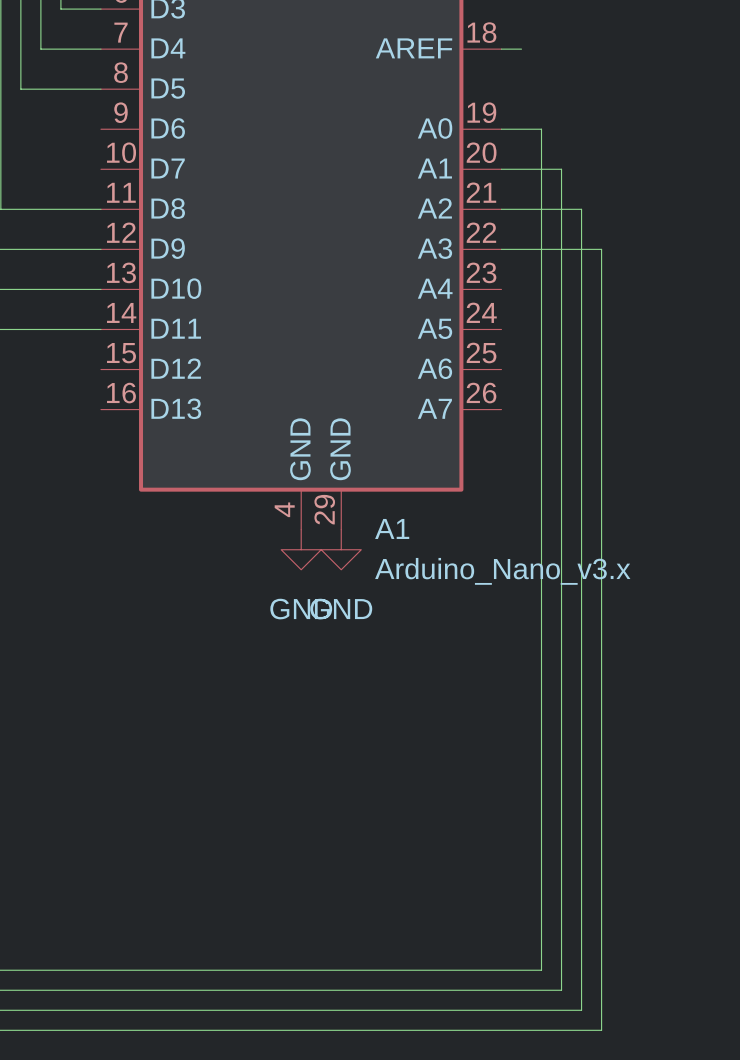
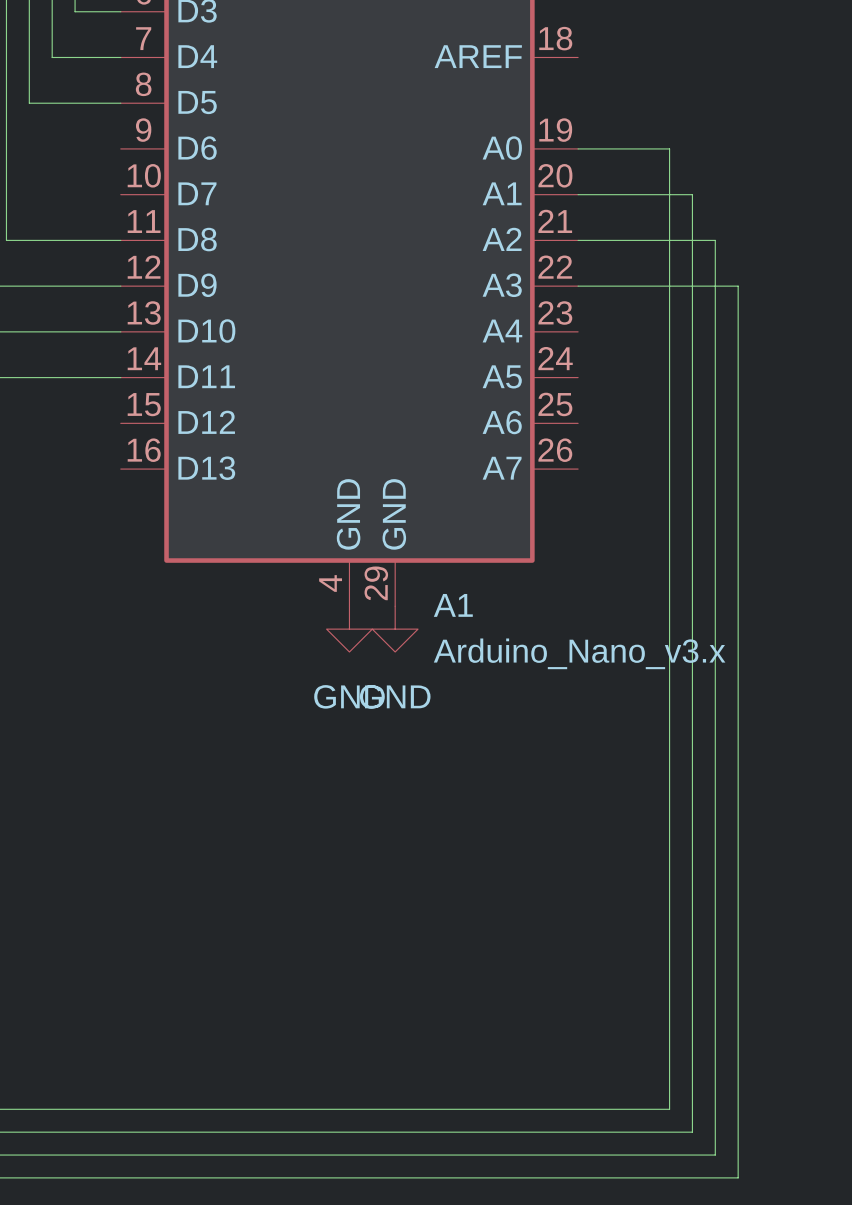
wire: (501, 49) (521, 49) -> none
wire: (541, 129) (541, 970) -> (623, 148) (669, 148) (669, 240) (715, 240) (715, 1155) (669, 1155)
wire: (561, 169) (561, 990) -> (646, 194) (692, 194) (692, 286) (738, 286) (738, 1177) (692, 1177)
wire: (581, 970) (581, 1010) -> (669, 1109) (623, 1109)
wire: (601, 990) (601, 1030) -> (692, 1132) (646, 1132)

